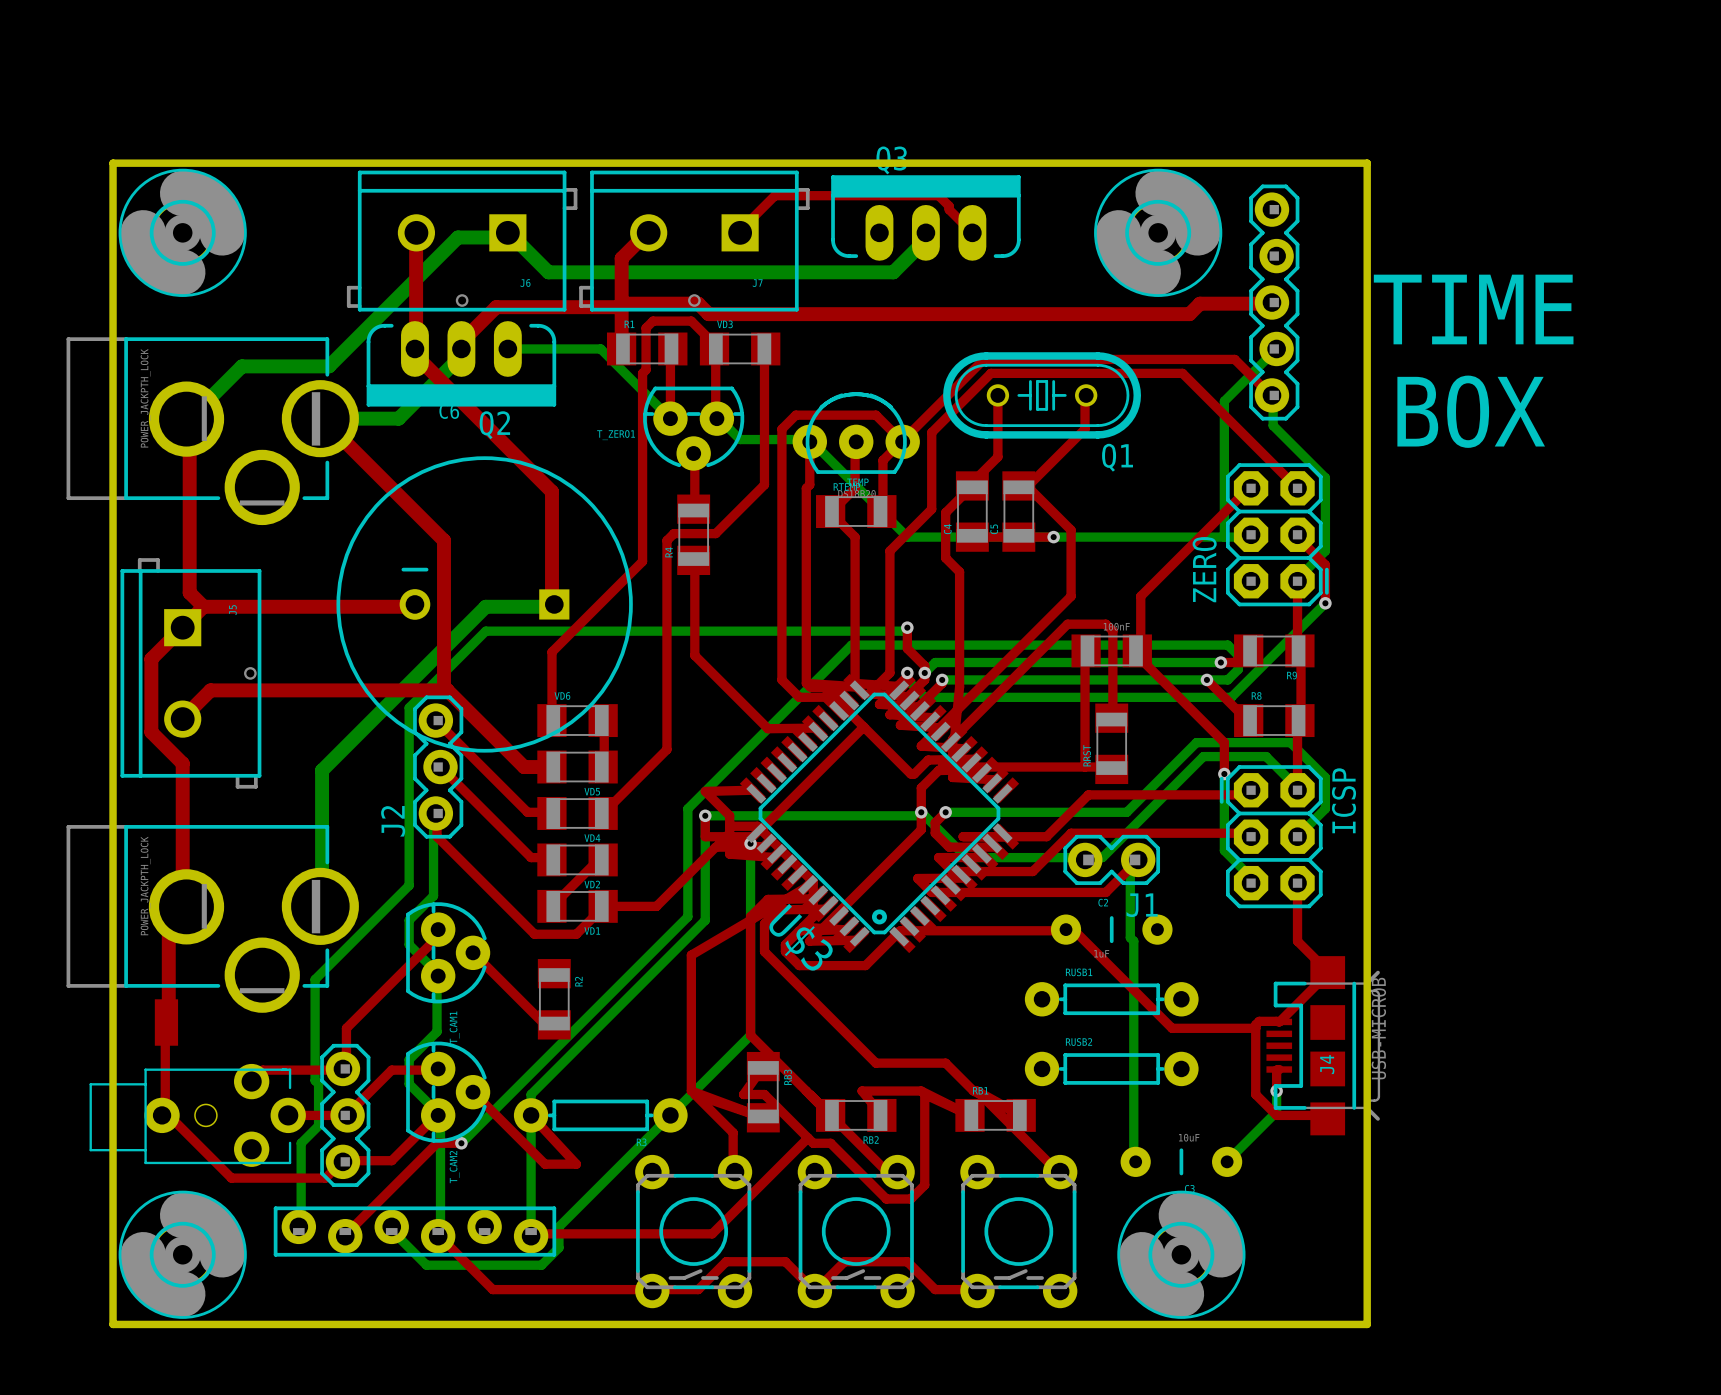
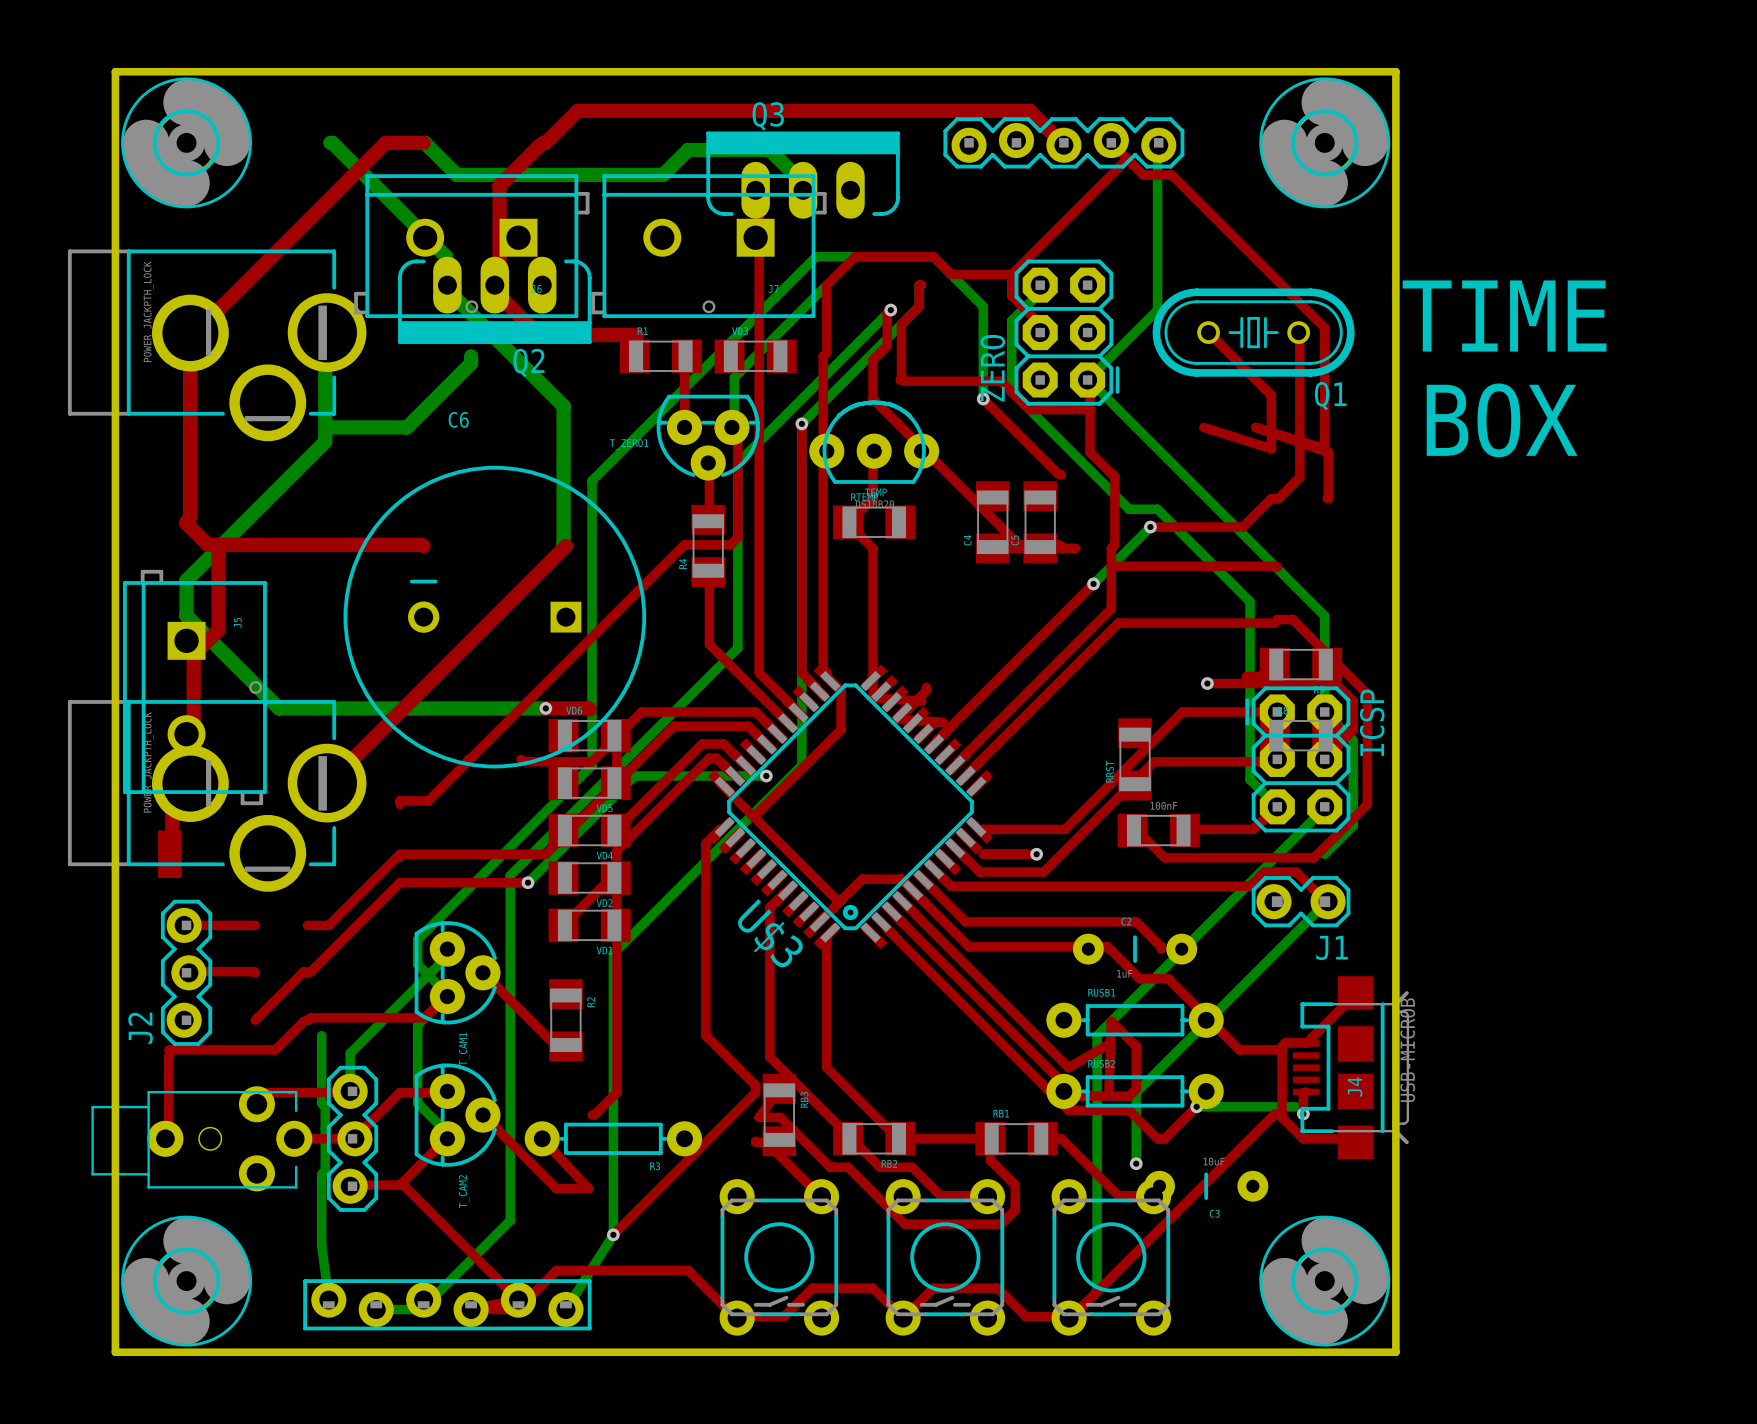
top track: none -> (1111, 140) (1111, 142) (1143, 174) (1171, 174) (1324, 327) (1324, 448) (1256, 427) (1328, 452) (1327, 498)
bottom track: none -> (330, 142) (446, 256) (446, 288) (563, 406) (563, 544) (565, 545)
top track: none -> (423, 142) (385, 142) (197, 331) (190, 333) (190, 516) (186, 522) (207, 544) (423, 545)
bottom track: none -> (423, 142) (456, 174) (663, 174) (688, 149) (769, 149) (801, 182) (803, 190)
top track: none -> (1063, 145) (1029, 110) (577, 110) (499, 185) (499, 281) (494, 285) (495, 292) (538, 334) (637, 335)
top track: none -> (1127, 158) (1011, 274)
board edge: (113, 163) (1367, 163) -> (115, 166) (115, 71) (1395, 71) (1395, 166)
top track: none -> (755, 190) (759, 196) (759, 672) (795, 709)
Q3 position: (925, 217) -> (803, 175)
part position: (182, 232) -> (186, 142)
top track: (416, 232) (416, 348) (412, 352) (551, 491) (551, 603) (554, 604) -> none
top track: (648, 232) (621, 258) (621, 348) -> none
top track: (740, 232) (740, 230) (774, 195) (938, 195) (949, 206) (949, 209) (972, 232) -> none
bottom track: (925, 232) (924, 240) (893, 272) (548, 272) (507, 232) (503, 237) (457, 237) (329, 366) (241, 366) (189, 418) (186, 419) -> none
part position: (1158, 232) -> (1324, 142)
top track: none -> (1011, 274) (1011, 295) (1040, 324) (1040, 332)
top track: none -> (921, 285) (919, 285) (919, 306) (901, 324) (900, 380) (1001, 381) (1029, 409) (1089, 409)
bottom track: none -> (921, 285) (919, 285) (919, 306) (801, 423) (801, 765) (613, 953) (613, 1234) (565, 1309)
bottom track: none -> (1040, 285) (1040, 292) (1011, 320) (1011, 391) (1129, 509) (1157, 509) (1250, 601) (1250, 779) (1277, 806)
top track: (1271, 302) (1199, 303) (1189, 314) (708, 314) (698, 303) (621, 303) -> none
part rotation: 0° (1274, 302) -> 90° counterclockwise (1063, 142)
part position: (1274, 302) -> (1063, 142)
top track: none -> (890, 310) (887, 313) (887, 345) (873, 359) (873, 398) (1018, 544) (1061, 545)
bottom track: none -> (890, 310) (737, 463) (737, 647) (510, 875) (510, 1220) (421, 1309) (376, 1309)
via: none -> (890, 310)
top track: (621, 307) (496, 307) (461, 342) (461, 348) -> none
bottom track: none -> (327, 332) (325, 334) (325, 441) (186, 580) (186, 615) (279, 708) (545, 708)
top track: none -> (1208, 332) (1271, 395) (1271, 448) (1203, 427)
top track: none -> (1298, 332) (1299, 477) (1277, 498)
bottom track: (507, 348) (600, 348) (670, 418) -> none
top track: (765, 348) (764, 484) (722, 526) -> (731, 427) (737, 430) (737, 537)
bottom track: (1276, 348) (1224, 401) (1224, 537) -> none
Q2 position: (461, 363) -> (494, 300)
top track: none -> (1087, 380) (1089, 381) (1089, 452) (1114, 477) (1114, 544) (1111, 548) (1111, 608) (958, 761)
top track: none -> (983, 398) (1057, 473) (1061, 474)
via: none -> (983, 398)
top track: (997, 395) (997, 456) (945, 512) (945, 558) (959, 571) (959, 686) (954, 738) -> none
Q1 position: (1042, 395) -> (1253, 332)
top track: (1086, 395) (1085, 429) (1029, 484) (1018, 485) (1018, 488) (1029, 488) (1071, 530) (1071, 596) (921, 746) (964, 748) -> none
top track: (1271, 395) (1234, 359) (983, 359) (902, 441) -> none
bottom track: (1271, 395) (1273, 425) (1325, 477) (1325, 551) (1297, 578) (1297, 581) -> none
top track: none -> (801, 423) (801, 672) (816, 688)
via: none -> (801, 423)
top track: (320, 418) (443, 540) (443, 686) (524, 767) (551, 767) -> none
top track: (716, 418) (715, 352) (714, 348) (712, 348) (712, 342) (691, 321) (653, 321) (646, 328) (646, 369) (642, 373) (642, 561) -> (688, 544) (684, 544) (656, 573)
bottom track: (719, 418) (740, 439) (809, 439) (809, 441) (813, 443) (907, 537) (1248, 537) (1251, 534) -> (734, 427) (734, 377) (826, 285)
top track: (186, 419) (189, 422) (189, 592) (203, 606) -> none
part position: (212, 431) -> (217, 345)
top track: (809, 441) (809, 484) (806, 488) -> (1011, 274) (951, 274) (933, 256) (855, 256) (826, 285) (826, 352) (823, 356) (823, 498)
top track: (902, 441) (875, 415) (795, 415) (781, 429) (781, 679) (799, 697) (845, 697) -> none
top track: (902, 441) (882, 460) (881, 511) -> none
top track: (1248, 488) (1140, 596) (1140, 648) (1137, 650) (1137, 655) (1224, 742) (1224, 774) -> (1274, 498) (1271, 498) (1242, 527) (1150, 527)
top track: (1297, 488) (1182, 373) (990, 373) (931, 432) (931, 509) (889, 551) (889, 672) (869, 693) (913, 697) -> none
bottom track: none -> (1150, 527) (1093, 583)
via: none -> (1150, 527)
top track: none -> (218, 544) (218, 630) (193, 655) (193, 779) (190, 786) (172, 804) (172, 840) (169, 842)
top track: (673, 533) (666, 540) (666, 749) -> (742, 761) (723, 743) (702, 743) (680, 765)
top track: none -> (565, 545) (327, 783)
ZERO position: (1277, 534) -> (1067, 332)
top track: (1297, 534) (1297, 537) (1325, 564) (1325, 603) -> none
via: (1053, 537) -> none
top track: none -> (1111, 566) (1277, 567)
top track: none -> (1093, 583) (937, 740)
via: none -> (1093, 583)
top track: (1297, 581) (1297, 648) (1301, 652) (1301, 718) (1297, 721) (1297, 742) -> (1207, 683) (1335, 683) (1353, 701) (1353, 729) (1324, 758)
bottom track: (1325, 603) (1231, 697) (924, 697) (907, 679) (907, 672) -> none
via: (1325, 603) -> none
top track: (414, 604) (412, 606) (203, 606) -> none
bottom track: (554, 604) (551, 606) (485, 606) (322, 770) (322, 906) (320, 906) -> none
top track: (203, 606) (151, 659) (151, 732) (182, 763) (182, 902) (186, 906) (186, 909) (168, 927) (168, 1010) (166, 1010) -> none
top track: (907, 627) (907, 648) (924, 666) (924, 679) (889, 714) (933, 717) -> none
bottom track: (907, 627) (903, 631) (485, 631) (409, 707) (409, 885) (315, 979) (315, 1014) -> none
via: (907, 627) -> none
top track: (694, 631) (694, 655) (767, 728) (814, 728) -> (709, 644) (784, 719)
top track: (1086, 650) (1085, 767) -> none
part position: (1111, 650) -> (1158, 830)
top track: (551, 652) (551, 720) -> (563, 665) (428, 800) (399, 800) (399, 804)
top track: (806, 655) (806, 683) (856, 686) (809, 686) (823, 686) (910, 774) (914, 774) (928, 760) (975, 759) -> (823, 669) (826, 672) (826, 677) (841, 690) (841, 729) (753, 816)
bottom track: (1220, 662) (935, 662) (924, 672) -> none
via: (1220, 662) -> none
via: none -> (1207, 683)
via: (907, 672) -> none
via: (924, 672) -> none
top track: (942, 679) (942, 683) (900, 725) (944, 728) -> none
bottom track: (942, 679) (1227, 679) (1238, 669) (1238, 655) (1227, 645) (851, 645) (687, 808) (687, 916) (461, 1143) -> none
via: (942, 679) -> none
top track: (1206, 679) (1248, 720) -> none
via: (1206, 679) -> none
top track: (447, 690) (210, 690) (182, 719) -> none
top track: none -> (545, 708) (589, 709)
via: none -> (545, 708)
top track: none -> (1277, 711) (1182, 711) (1065, 829) (979, 830)
top track: none -> (773, 730) (755, 711) (641, 711) (592, 761) (524, 761) (520, 759)
top track: (1111, 718) (1112, 631) (1105, 624) (1067, 624) (952, 739) (952, 756) (942, 767) (985, 769) (938, 770) (921, 787) (921, 829) (809, 941) (856, 940) -> none
top track: (435, 720) (527, 812) (551, 813) -> none
top track: none -> (763, 740) (748, 726) (673, 726) (545, 854) (399, 854) (399, 856) (396, 857) (328, 925) (307, 925)
top track: (863, 726) (761, 829) -> none
top track: none -> (1277, 759) (1274, 761) (1154, 761) (1043, 872) (979, 872) (958, 851)
top track: (1297, 743) (1297, 790) -> none
top track: none -> (731, 772) (716, 758) (709, 758) (616, 850) (616, 1092) (592, 1115)
top track: none -> (969, 772) (1118, 623) (1274, 623) (1277, 619) (1292, 619) (1367, 694) (1367, 804) (1314, 857) (1164, 857) (1139, 832) (1132, 832) (1132, 830)
bottom track: none -> (766, 776) (634, 776) (528, 882)
via: none -> (766, 776)
top track: none -> (721, 783) (839, 902)
J2 position: (438, 767) -> (186, 972)
top track: (440, 767) (531, 857) (548, 857) (551, 859) -> none
top track: (1111, 769) (1109, 767) (963, 767) (952, 777) (995, 779) -> none
bottom track: (1224, 774) (1224, 850) (1248, 875) (1248, 881) (1251, 883) -> none
via: (1224, 774) -> none
bottom track: (1325, 777) (1290, 742) (1196, 742) (1126, 812) (945, 812) -> (1353, 793) (1353, 740) (1324, 711) (1324, 615) (1087, 380) (1157, 310) (1158, 145)
top track: (752, 790) (705, 791) (729, 815) (729, 833) (719, 843) (763, 847) (715, 847) (656, 906) (603, 906) (576, 934) (534, 934) (437, 836) (435, 813) -> none
bottom track: (1297, 790) (1297, 787) (1266, 756) (1203, 756) (1102, 857) (1088, 857) (1085, 859) (1085, 857) (966, 857) (924, 815) (705, 815) (705, 920) (531, 1094) (531, 1236) -> (1324, 806) (1097, 1035) (1097, 1291) (1069, 1318)
top track: (1245, 794) (1088, 794) (1046, 836) (1015, 836) -> (1271, 811) (1253, 829) (1184, 830)
via: (921, 812) -> none
top track: (945, 812) (935, 822) (935, 833) (949, 847) (995, 847) -> none
via: (945, 812) -> none
bottom track: (435, 813) (433, 815) (433, 895) -> (983, 398) (983, 306) (933, 256) (816, 256) (592, 480) (592, 765) (442, 914)
U$3 position: (879, 813) -> (850, 806)
top track: (705, 815) (705, 836) (752, 836) -> none
via: (705, 815) -> none
top track: (729, 826) (757, 826) (813, 881) (813, 916) (802, 927) (845, 929) (799, 930) (785, 944) (785, 951) (799, 965) (865, 965) (900, 930) (1074, 930) (1172, 1028) (1213, 1028) -> (816, 925) (862, 879) (901, 879) (969, 946) (1107, 946) (1139, 978) (1168, 978) (1239, 1049)
via: none -> (1036, 854)
top track: (1251, 836) (1245, 833) (1071, 833) (1032, 871) (952, 871) (938, 857) (985, 857) -> none
ICSP position: (1271, 836) -> (1297, 759)
top track: (750, 843) (740, 843) (729, 854) (773, 857) -> none
bottom track: (750, 843) (750, 1035) (558, 1226) (558, 1247) (541, 1265) (426, 1265) (391, 1230) (391, 1226) -> none
via: (750, 843) -> none
top track: none -> (937, 872) (951, 886) (1250, 886) (1264, 872) (1296, 872) (1328, 901)
J1 position: (1111, 859) -> (1301, 901)
top track: (1138, 859) (1105, 892) (931, 892) (917, 878) (964, 878) -> none
bottom track: (1138, 859) (1130, 868) (1130, 937) (1133, 941) (1133, 1160) (1135, 1161) -> none
top track: none -> (528, 882) (399, 882) (311, 971) (303, 971) (255, 1020)
via: none -> (528, 882)
top track: none -> (927, 883) (965, 921) (1136, 921) (1161, 946) (1161, 949)
top track: none -> (784, 893) (769, 907) (769, 1057) (844, 1131) (844, 1138) (851, 1138) (880, 1167) (912, 1167) (940, 1195) (987, 1196)
top track: (1297, 883) (1297, 941) (1327, 972) -> none
bottom track: none -> (1328, 901) (1136, 1092) (1136, 1163)
top track: none -> (905, 904) (1068, 1067) (1108, 1043)
top track: (804, 888) (691, 955) -> (721, 830) (720, 829) (705, 843) (705, 975)
top track: none -> (895, 915) (1075, 1096) (1129, 1096) (1136, 1089) (1136, 1046) (1111, 1021) (1108, 1091)
top track: (814, 898) (767, 899) (750, 916) (750, 1035) (830, 1115) -> none
top track: none -> (184, 925) (255, 925)
top track: none -> (884, 925) (1068, 1110) (1129, 1110) (1157, 1138) (1164, 1138) (1196, 1106)
top track: (825, 909) (778, 909) (764, 923) (764, 951) (875, 1063) (945, 1063) (973, 1091) (1021, 1115) (977, 1091) (1057, 1171) (1060, 1172) -> none
part position: (212, 918) -> (217, 795)
top track: (438, 929) (437, 937) (346, 1028) (346, 1066) (342, 1068) -> none
bottom track: none -> (447, 949) (446, 957) (350, 1053) (350, 1091)
top track: none -> (188, 972) (255, 972)
bottom track: (437, 976) (437, 1031) (409, 1059) -> (446, 996) (417, 1024) (417, 1081)
top track: none -> (447, 996) (424, 1017) (311, 1017) (303, 1021) (275, 1049) (168, 1049)
top track: (691, 1014) (691, 1091) (763, 1117) (694, 1094) (733, 1132) (733, 1171) (735, 1172) -> (705, 1035) (755, 1085) (755, 1092) (613, 1234)
part position: (166, 1022) -> (169, 854)
bottom track: (409, 1080) (409, 1084) (437, 1111) (438, 1115) (440, 1115) (440, 1233) (438, 1236) -> (417, 1103) (446, 1131) (447, 1138)
bottom track: none -> (1196, 1106) (1296, 1106)
via: none -> (1196, 1106)
bottom track: (1276, 1091) (1276, 1111) (1227, 1161) -> none
top track: (809, 1094) (886, 1171) (897, 1172) -> none
top track: (165, 1115) (168, 1115) (231, 1178) (325, 1178) (342, 1161) -> none
top track: (881, 1115) (862, 1091) (921, 1091) (969, 1115) (924, 1094) (924, 1185) (910, 1199) -> (826, 936) (826, 1067) (897, 1138) (990, 1138) (990, 1160) (1015, 1185) (1015, 1209) (1001, 1224) (929, 1224)
top track: none -> (1042, 1138) (1061, 1138) (1118, 1195) (1153, 1196)
top track: none -> (755, 1141) (766, 1142) (821, 1196)
bottom track: (318, 1125) (301, 1143) (301, 1226) (298, 1226) -> (325, 1149) (325, 1170) (321, 1174) (321, 1245) (328, 1300)
top track: (808, 1138) (712, 1233) (531, 1233) (531, 1236) -> none
via: none -> (1136, 1163)
top track: (461, 1143) (437, 1143) (345, 1236) -> none
via: (461, 1143) -> none
via: none -> (613, 1234)
part position: (414, 1231) -> (447, 1304)
part: (693, 1231) -> none
part: none -> (779, 1257)
part: (856, 1231) -> none
part: none -> (945, 1257)
part: (1018, 1231) -> none
part: none -> (1111, 1257)
top track: (438, 1236) (492, 1289) (698, 1289) (726, 1261) (785, 1261) (814, 1290) (844, 1261) -> (399, 1185) (403, 1185) (517, 1298) (517, 1309) (471, 1309) (520, 1298) (528, 1298) (556, 1270) (688, 1270) (737, 1318) (784, 1316) (812, 1288) (862, 1288)
part position: (1181, 1254) -> (1324, 1281)
top track: (855, 1261) (907, 1261) (935, 1289) (977, 1290) -> (873, 1288) (903, 1318) (933, 1288) (997, 1288) (1025, 1316) (1069, 1318) (1274, 1113) (1278, 1113)

